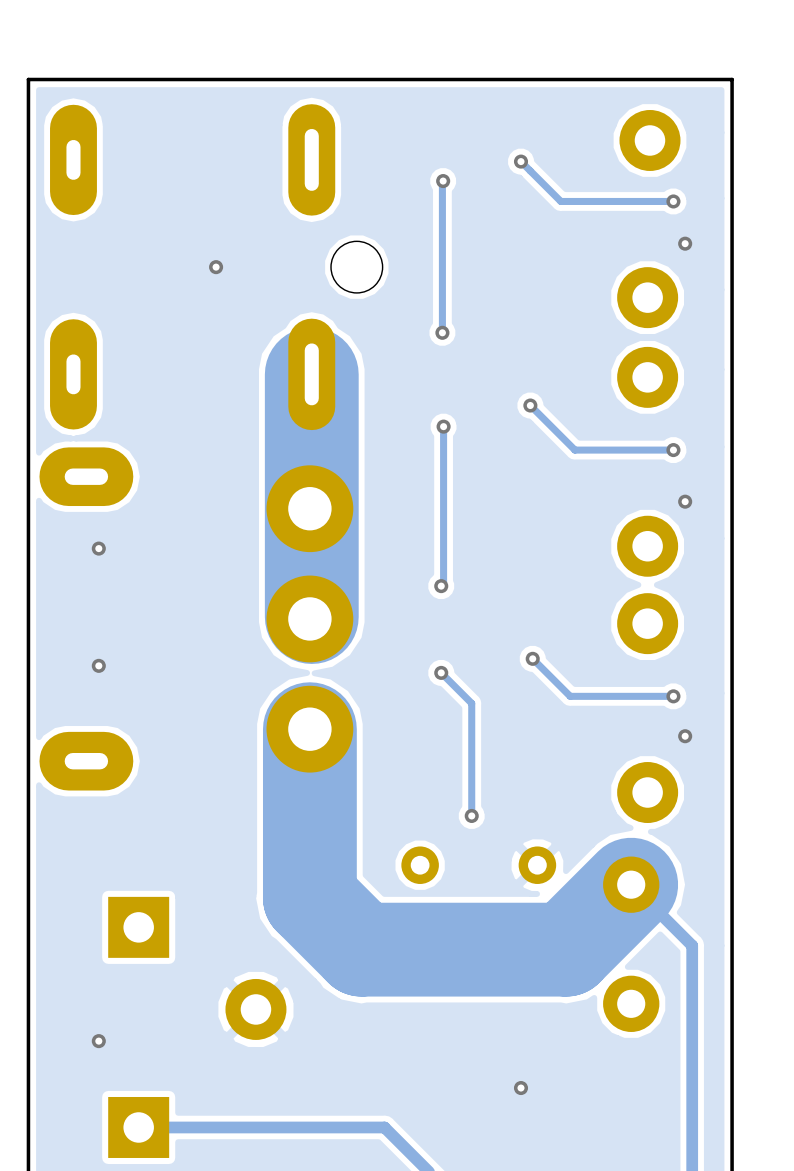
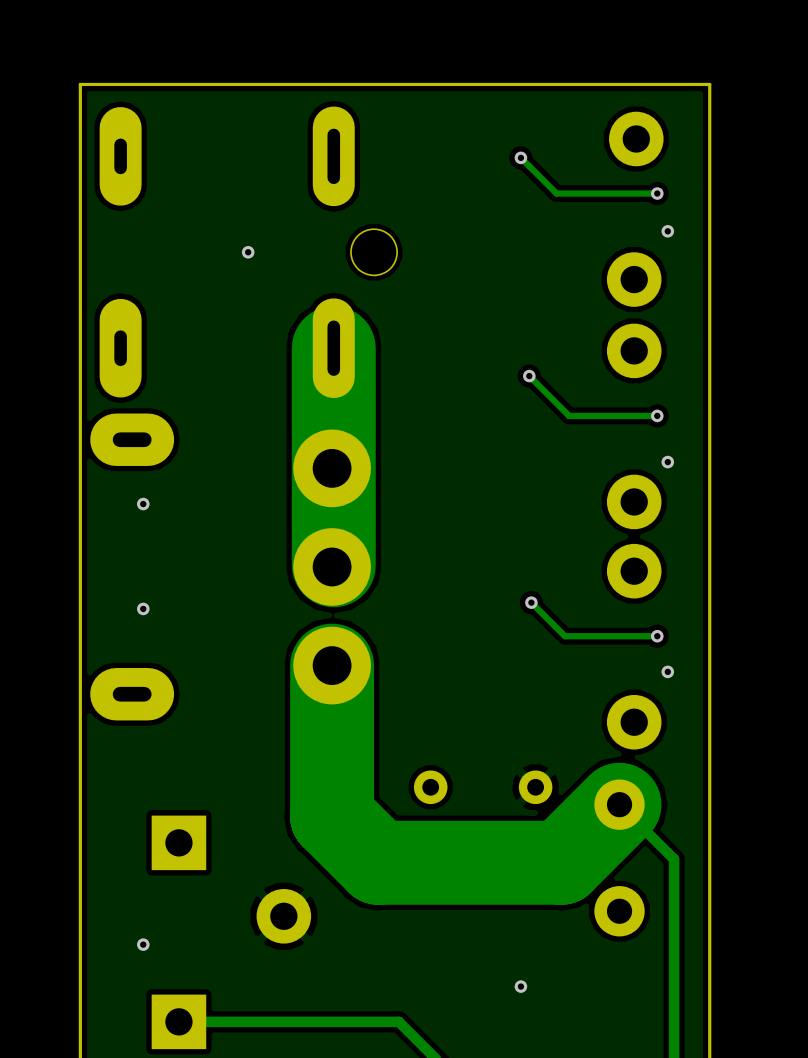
track: (443, 181) (442, 332) -> none
via: (443, 181) -> none
via: (442, 332) -> none
track: (443, 426) (443, 583) (441, 586) -> none
via: (443, 426) -> none
via: (441, 586) -> none
track: (441, 672) (471, 703) (471, 815) -> none
via: (441, 672) -> none
via: (471, 815) -> none

